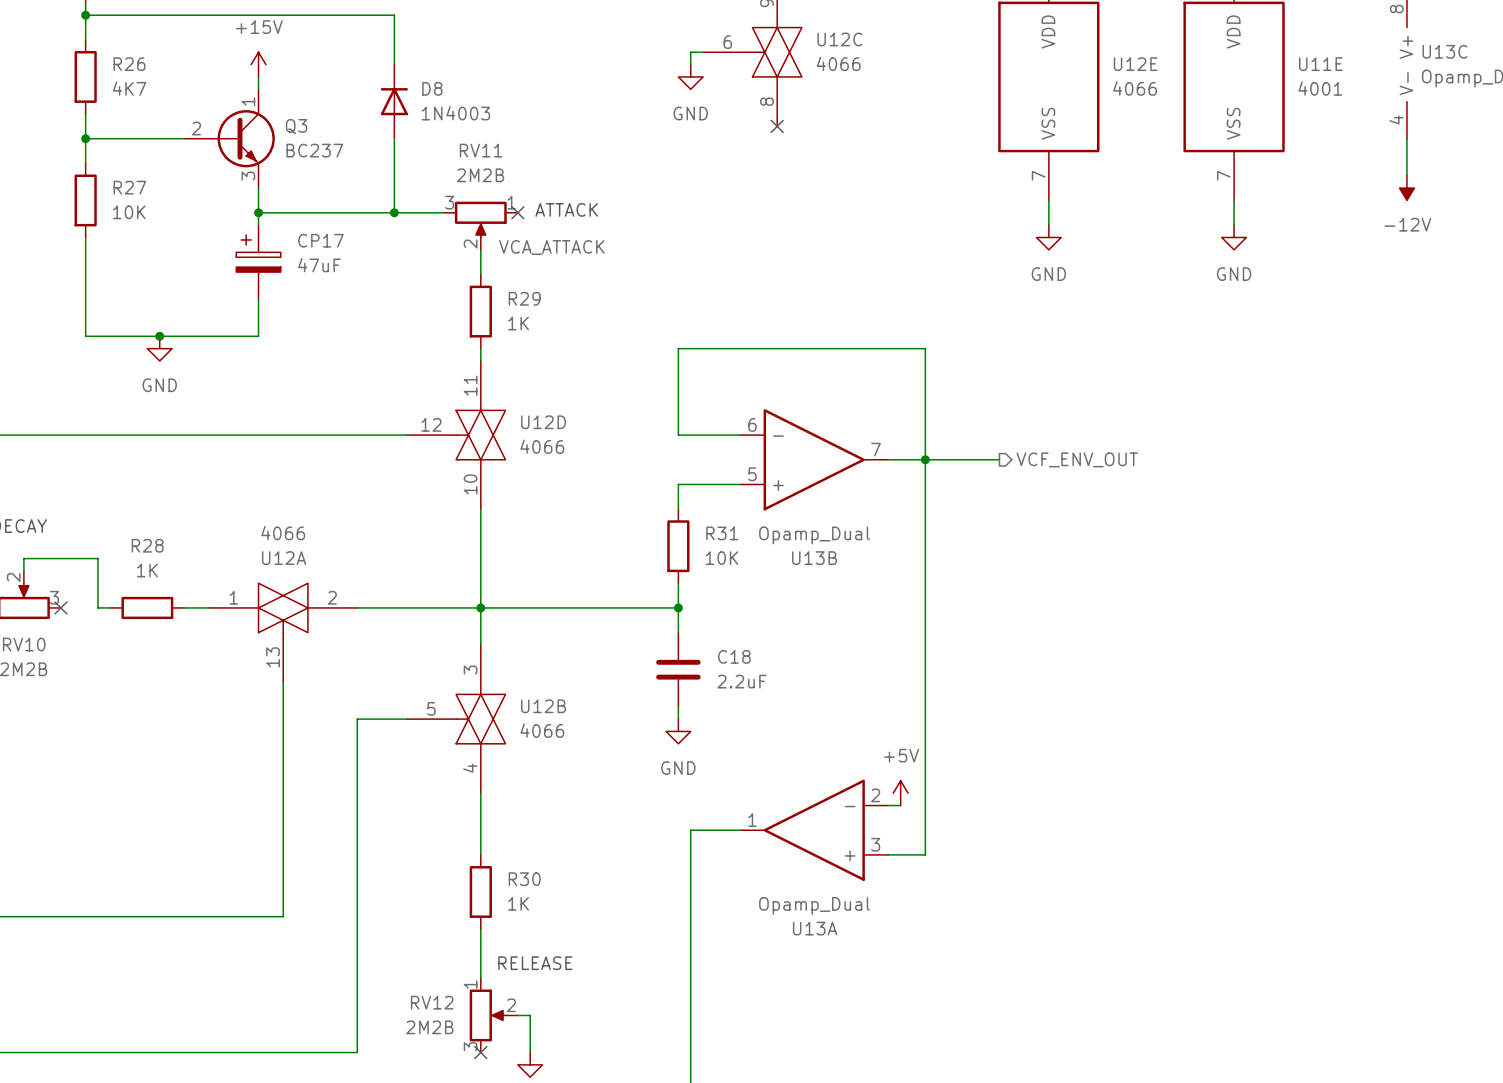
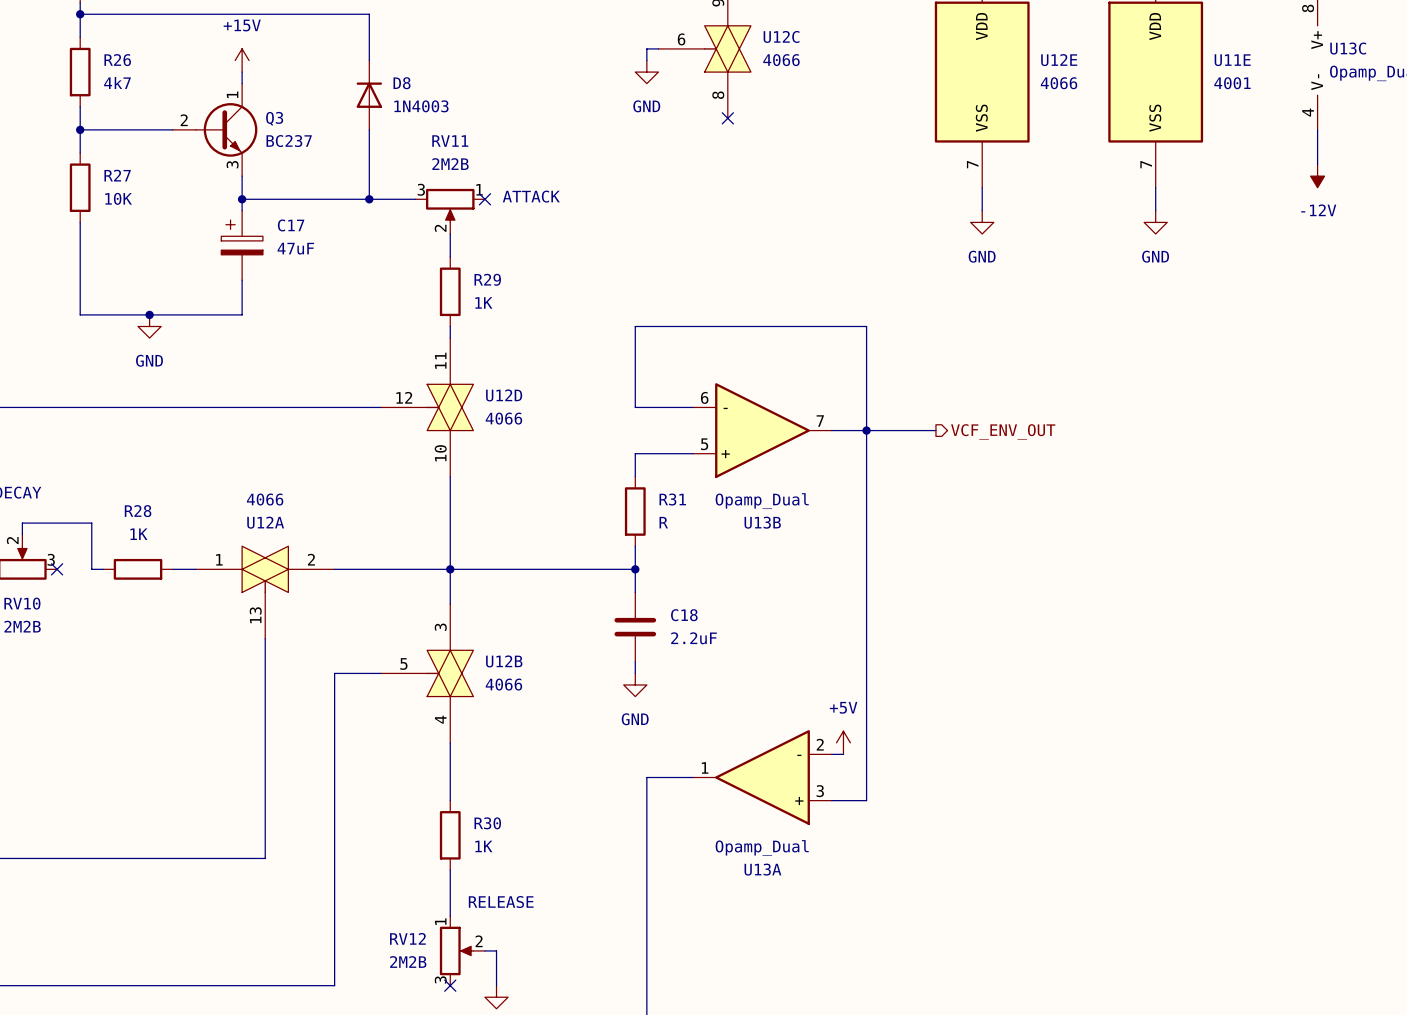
R26 value: 4K7 (129, 88) -> 4k7 (117, 82)
CP17 name: CP17 (320, 240) -> C17 (291, 225)
RV11 text: VCA_ATTACK (551, 247) -> none
R31 value: 10K (721, 558) -> R (663, 522)

